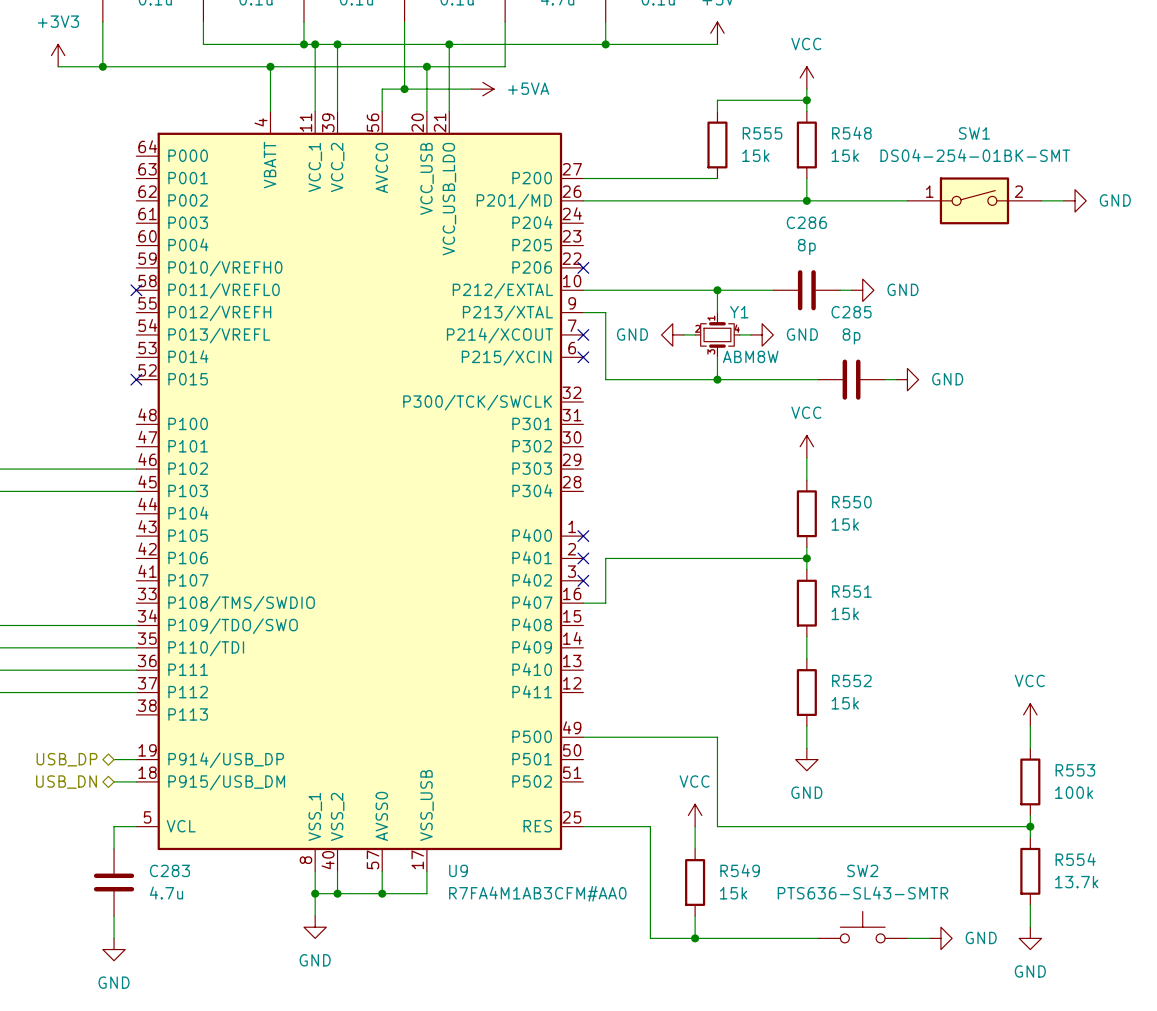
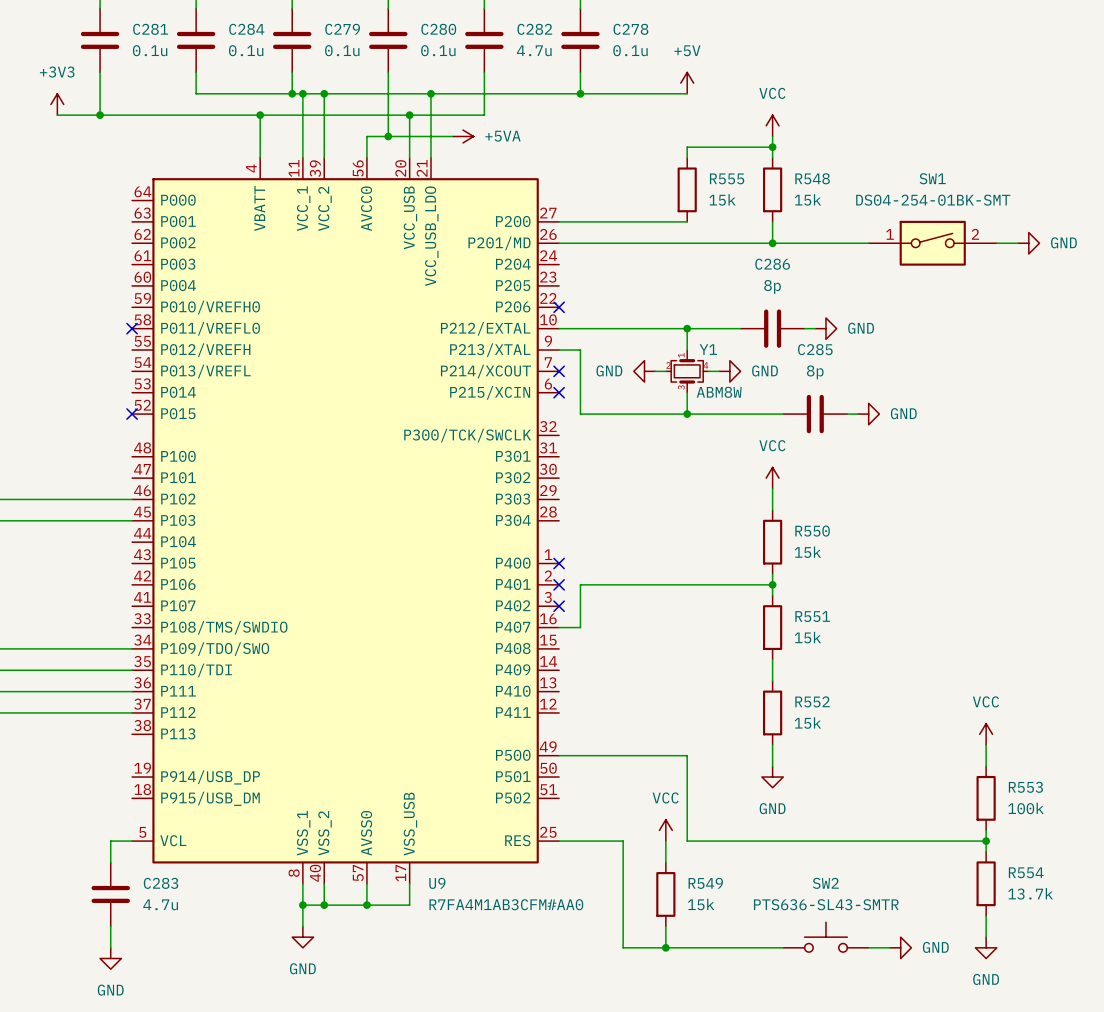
hierarchical label: USB_DP (67, 759) -> none
wire: (114, 759) (136, 759) -> none
wire: (114, 781) (136, 781) -> none
hierarchical label: USB_DN (66, 782) -> none

